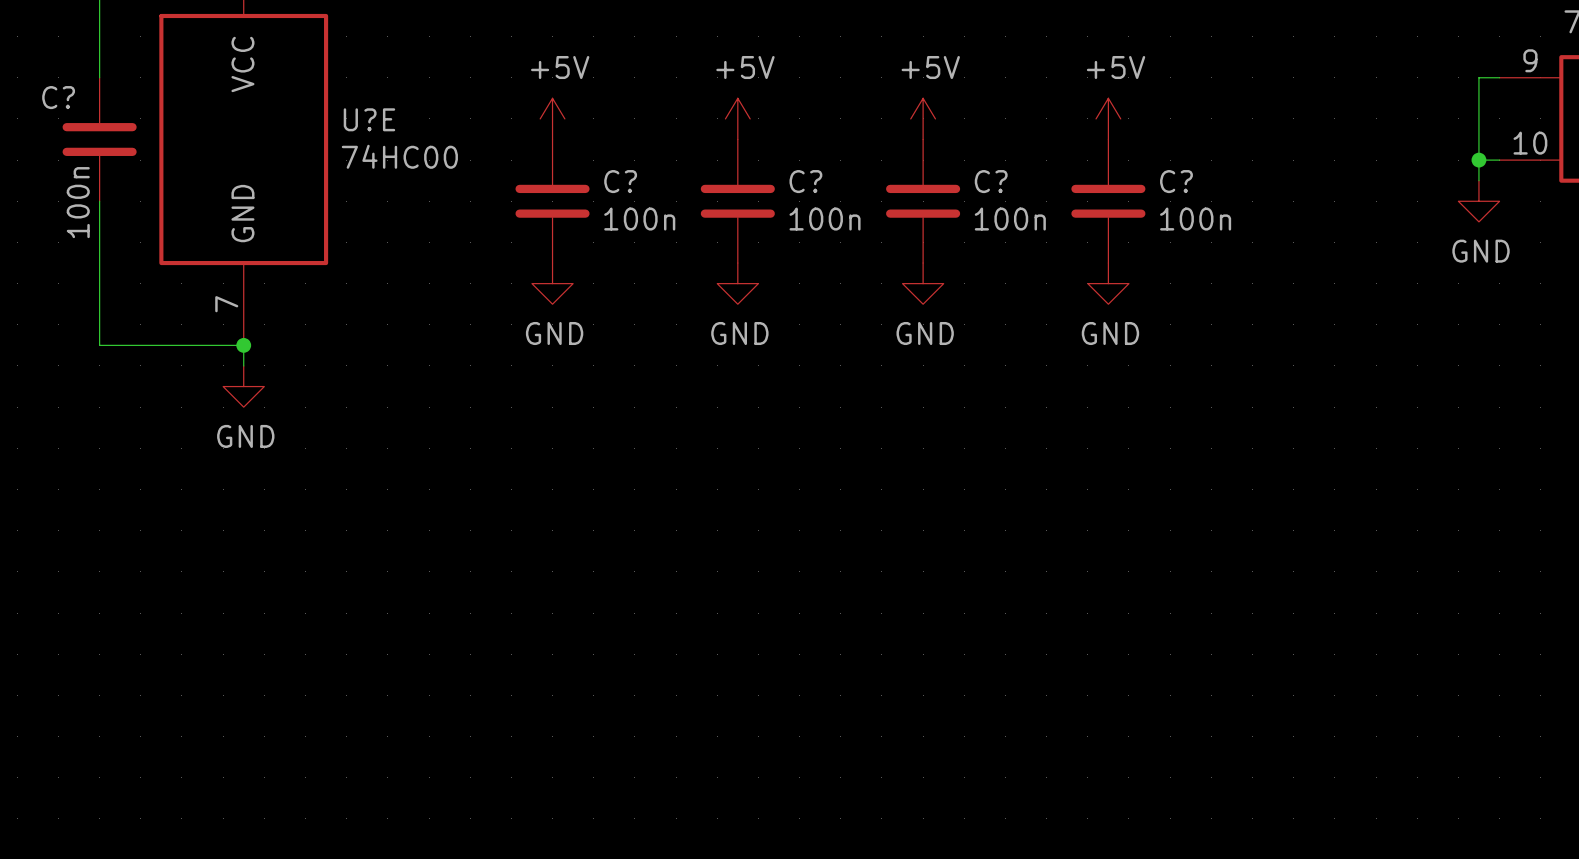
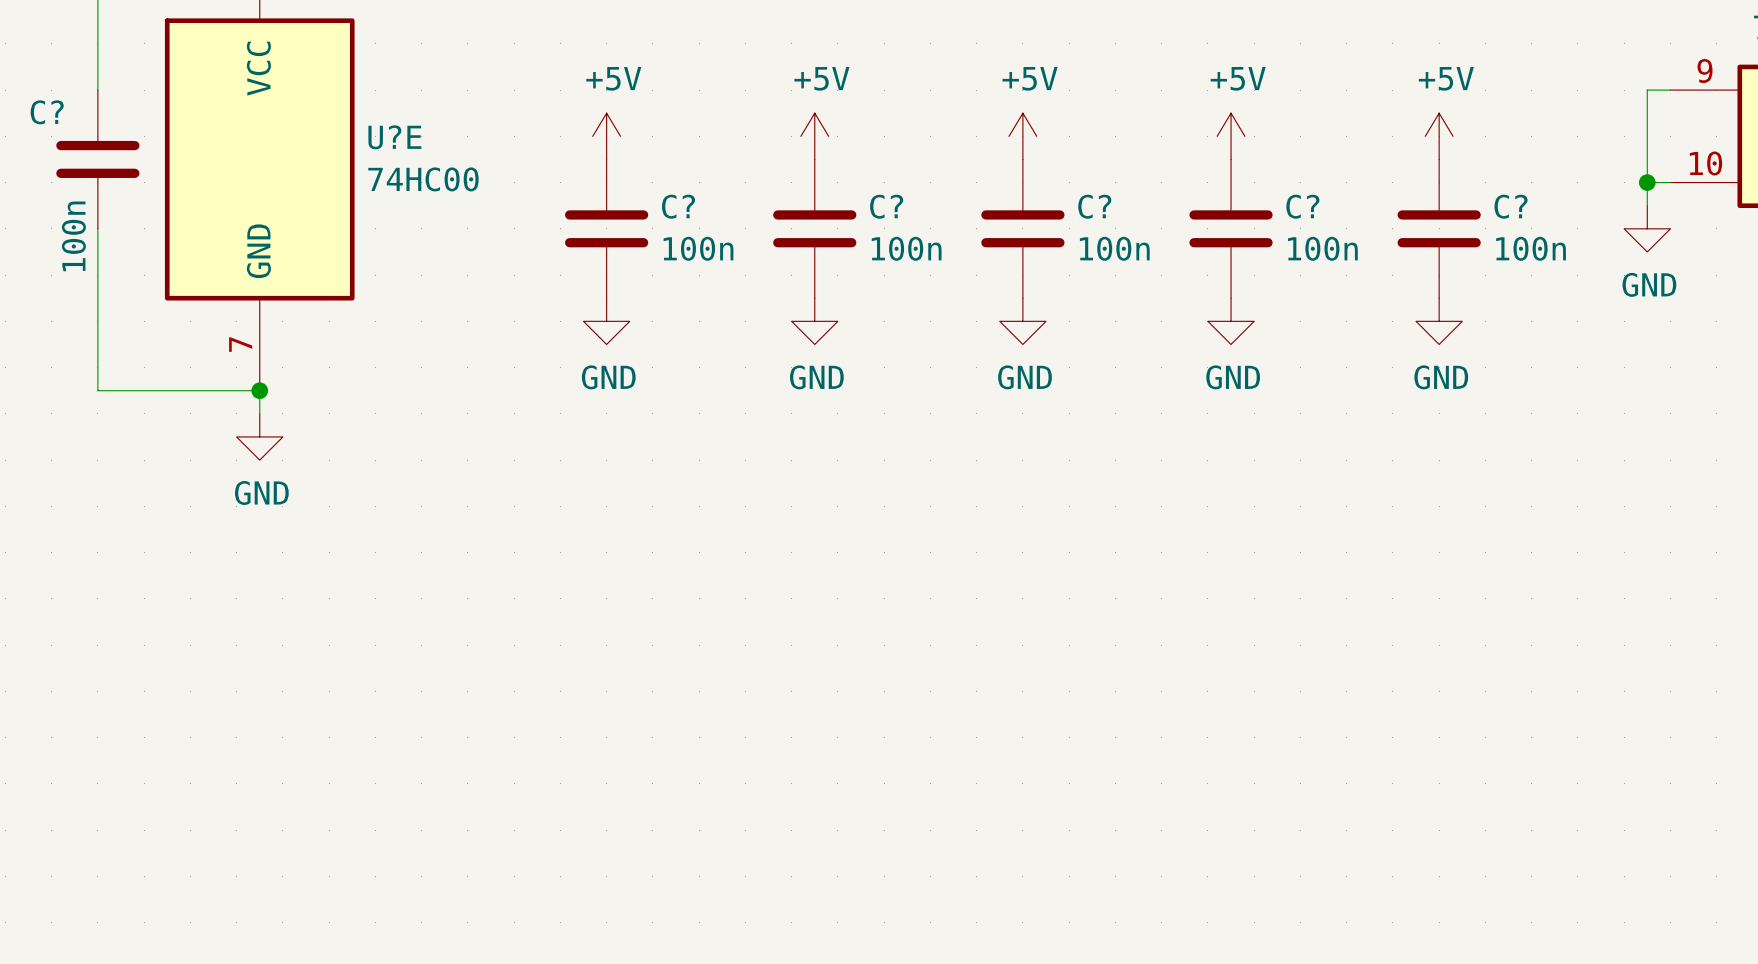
power symbol: none -> +5V (1439, 136)
C?: none -> 100n (1439, 228)
power symbol: none -> GND (1439, 321)

